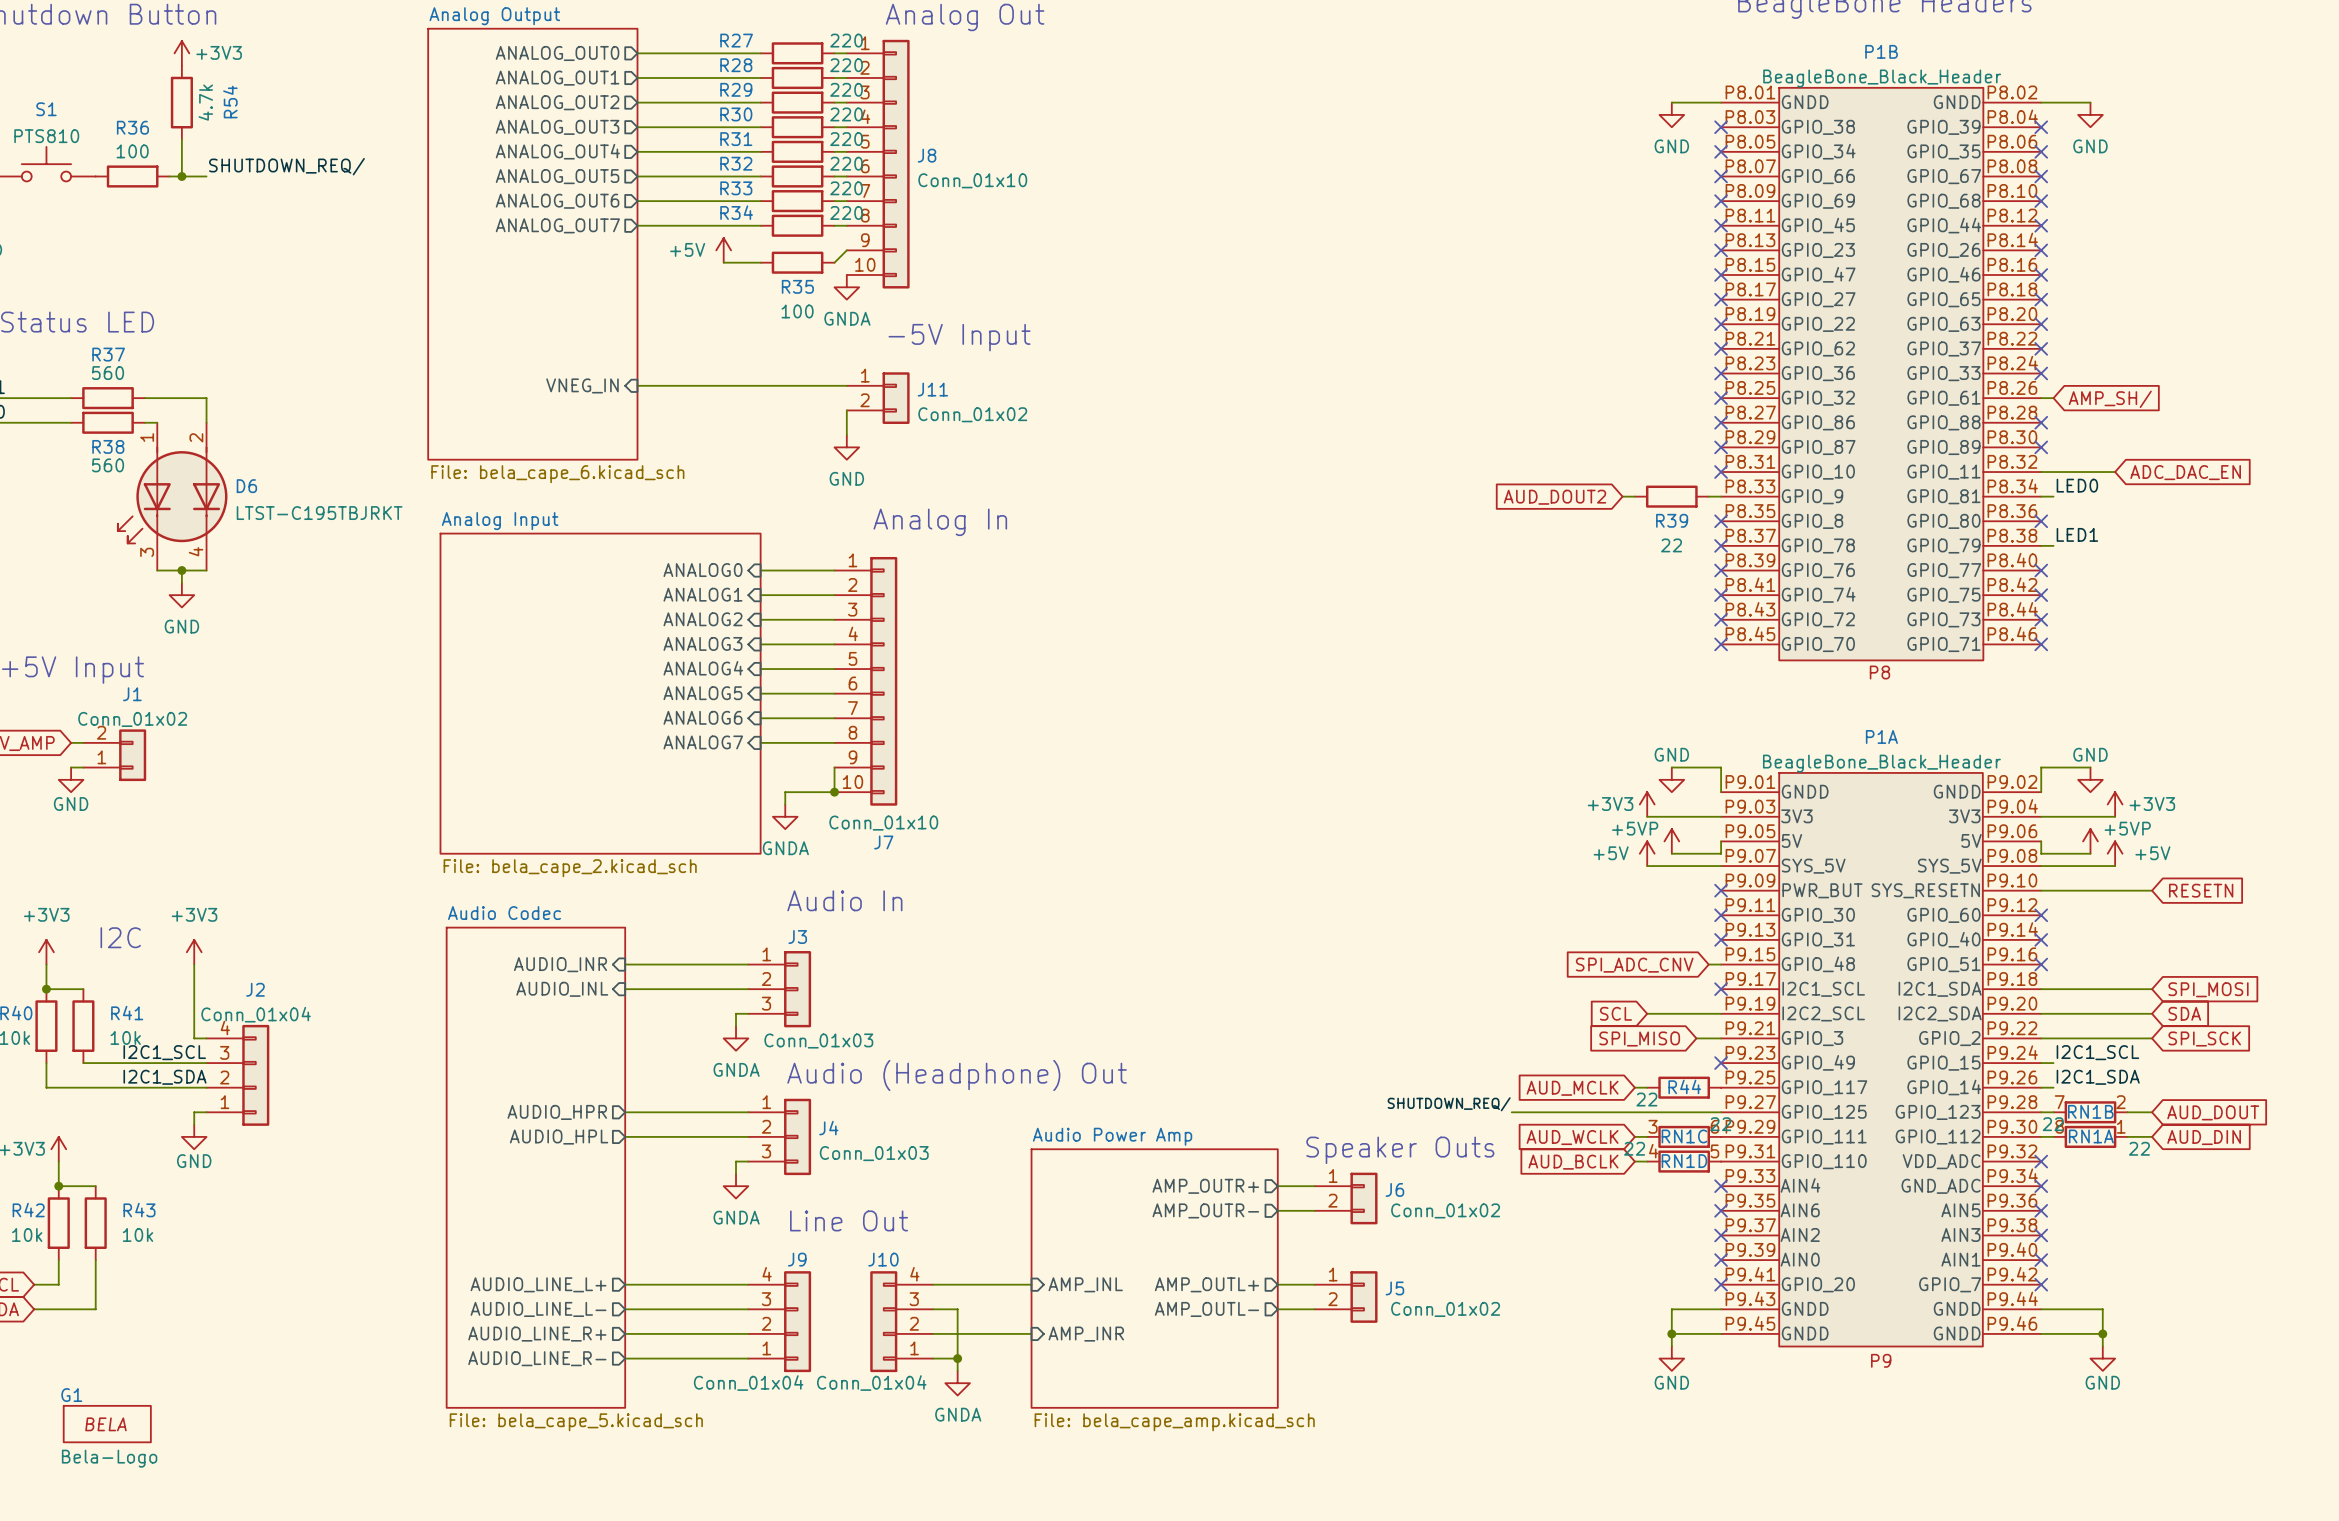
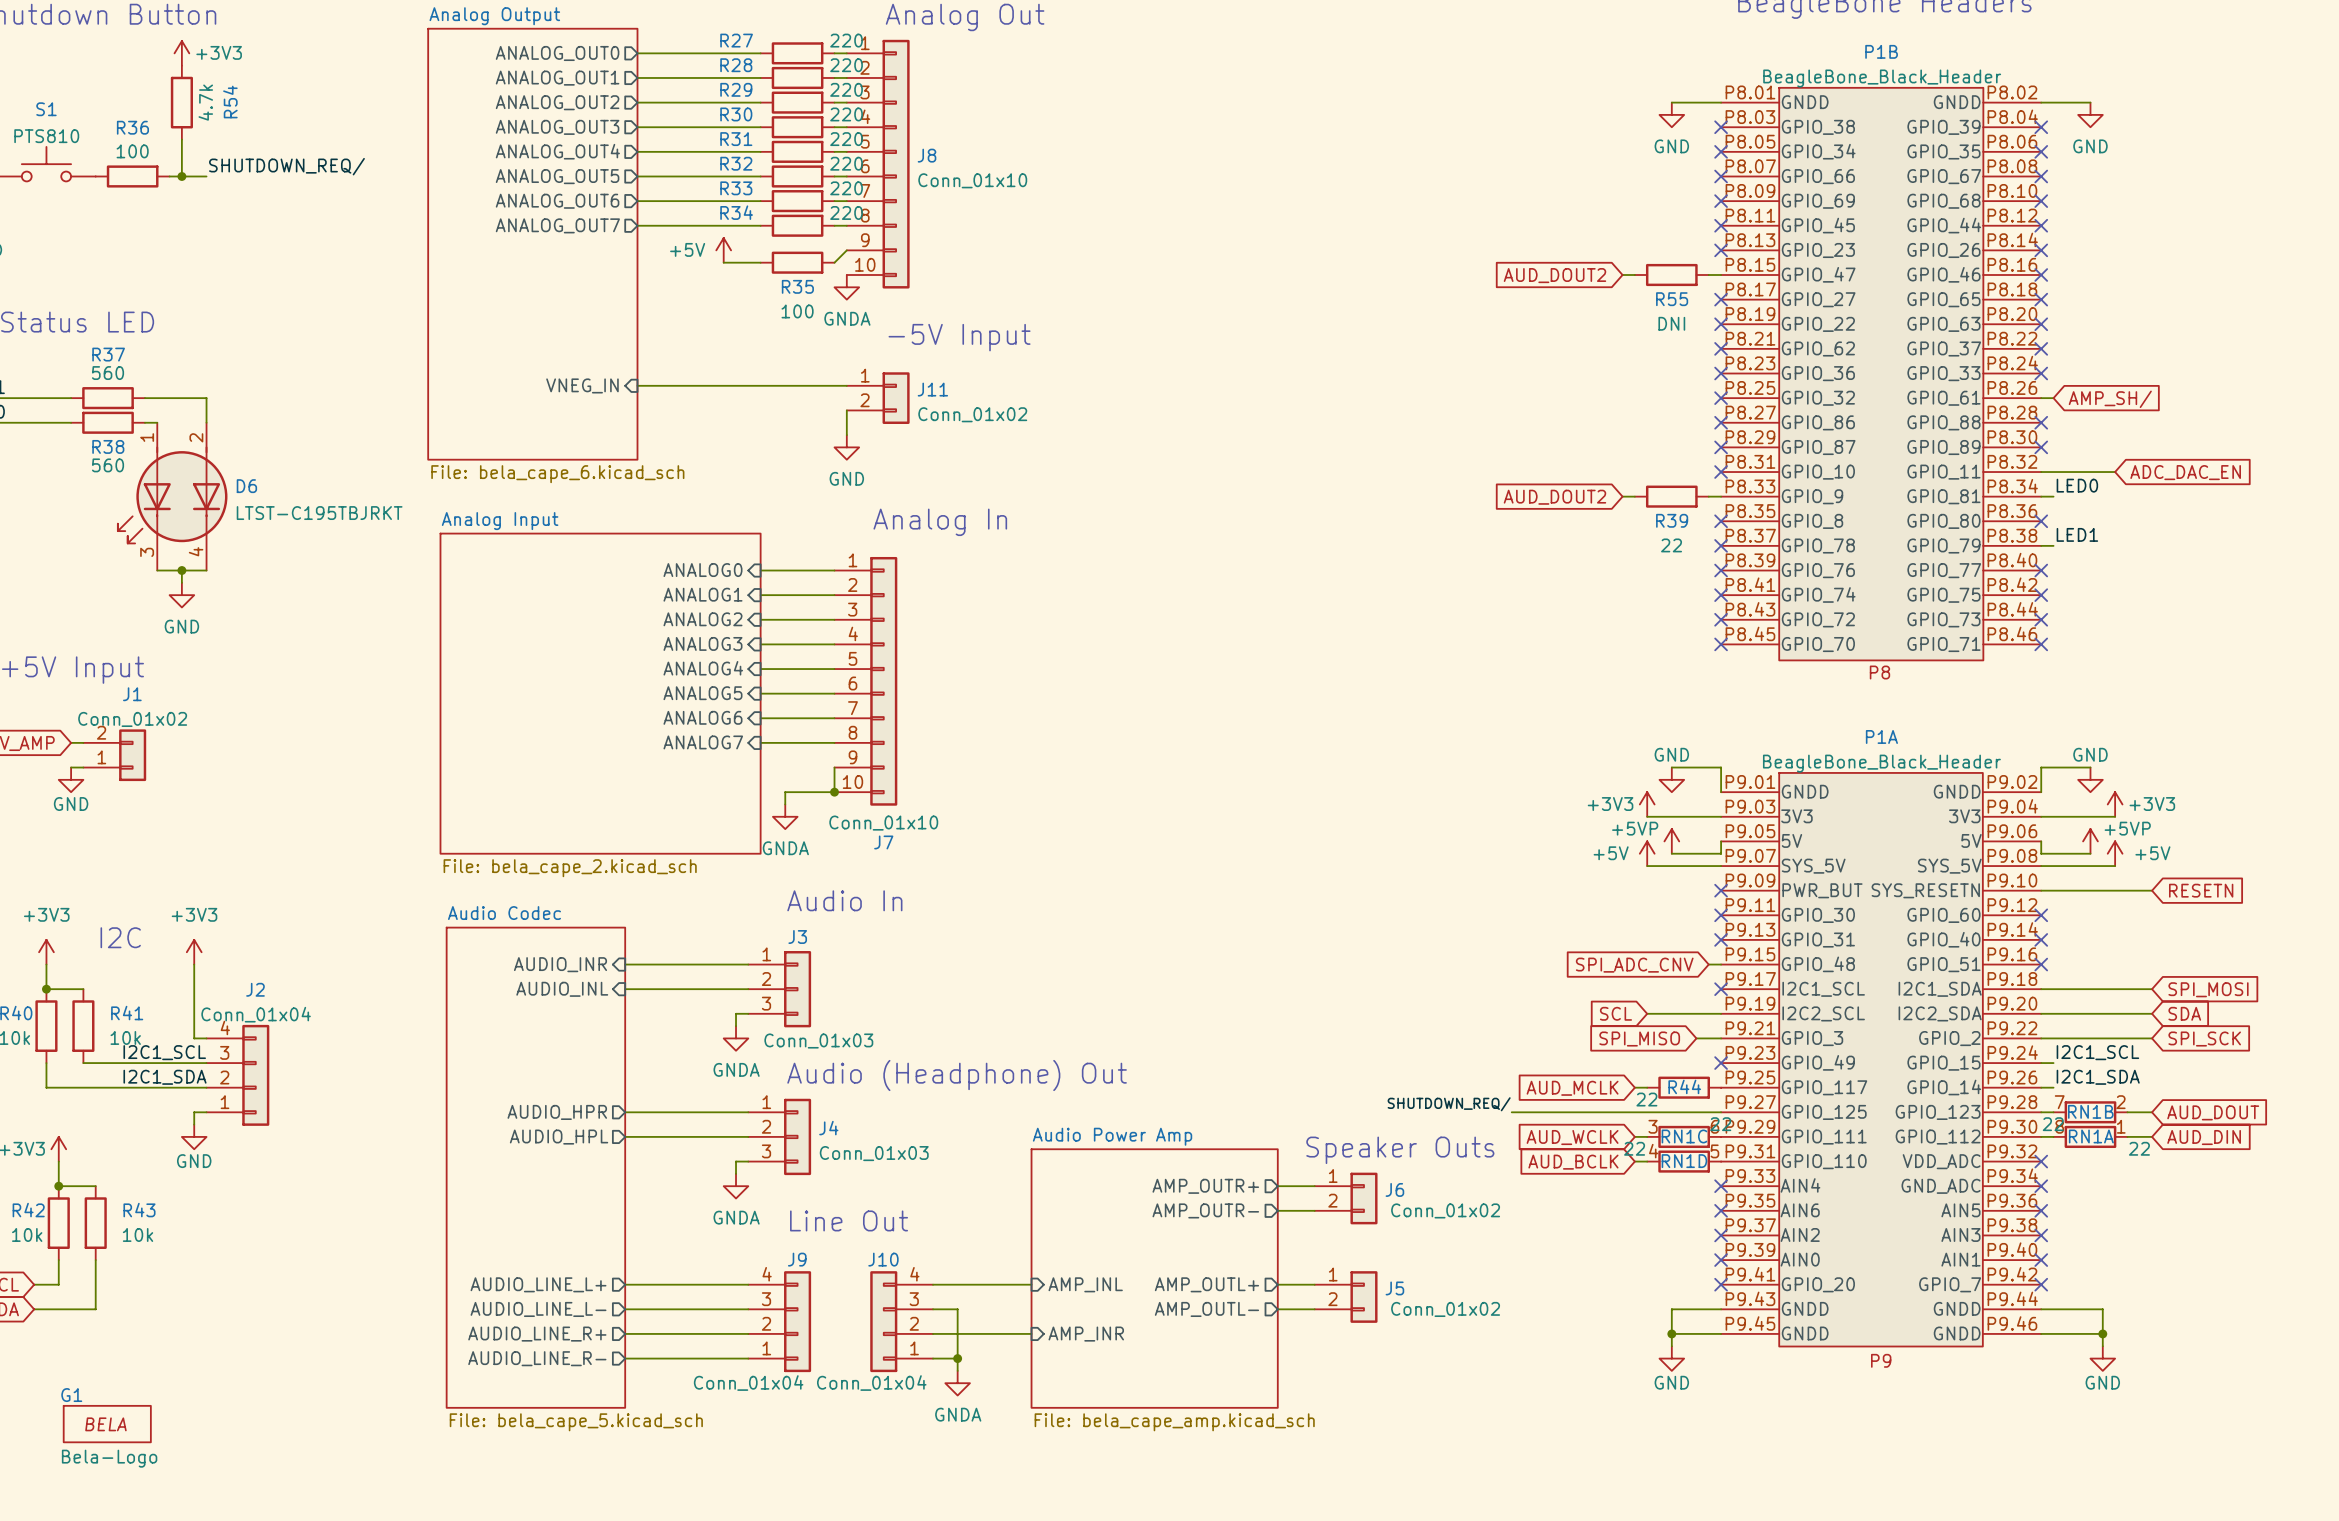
global label: none -> AUD_DOUT2 (1554, 275)
wire: none -> (1622, 275) (1634, 275)
R55: none -> DNI (1671, 275)
wire: none -> (1708, 275) (1721, 275)
no-connect mark: (1721, 275) -> none

